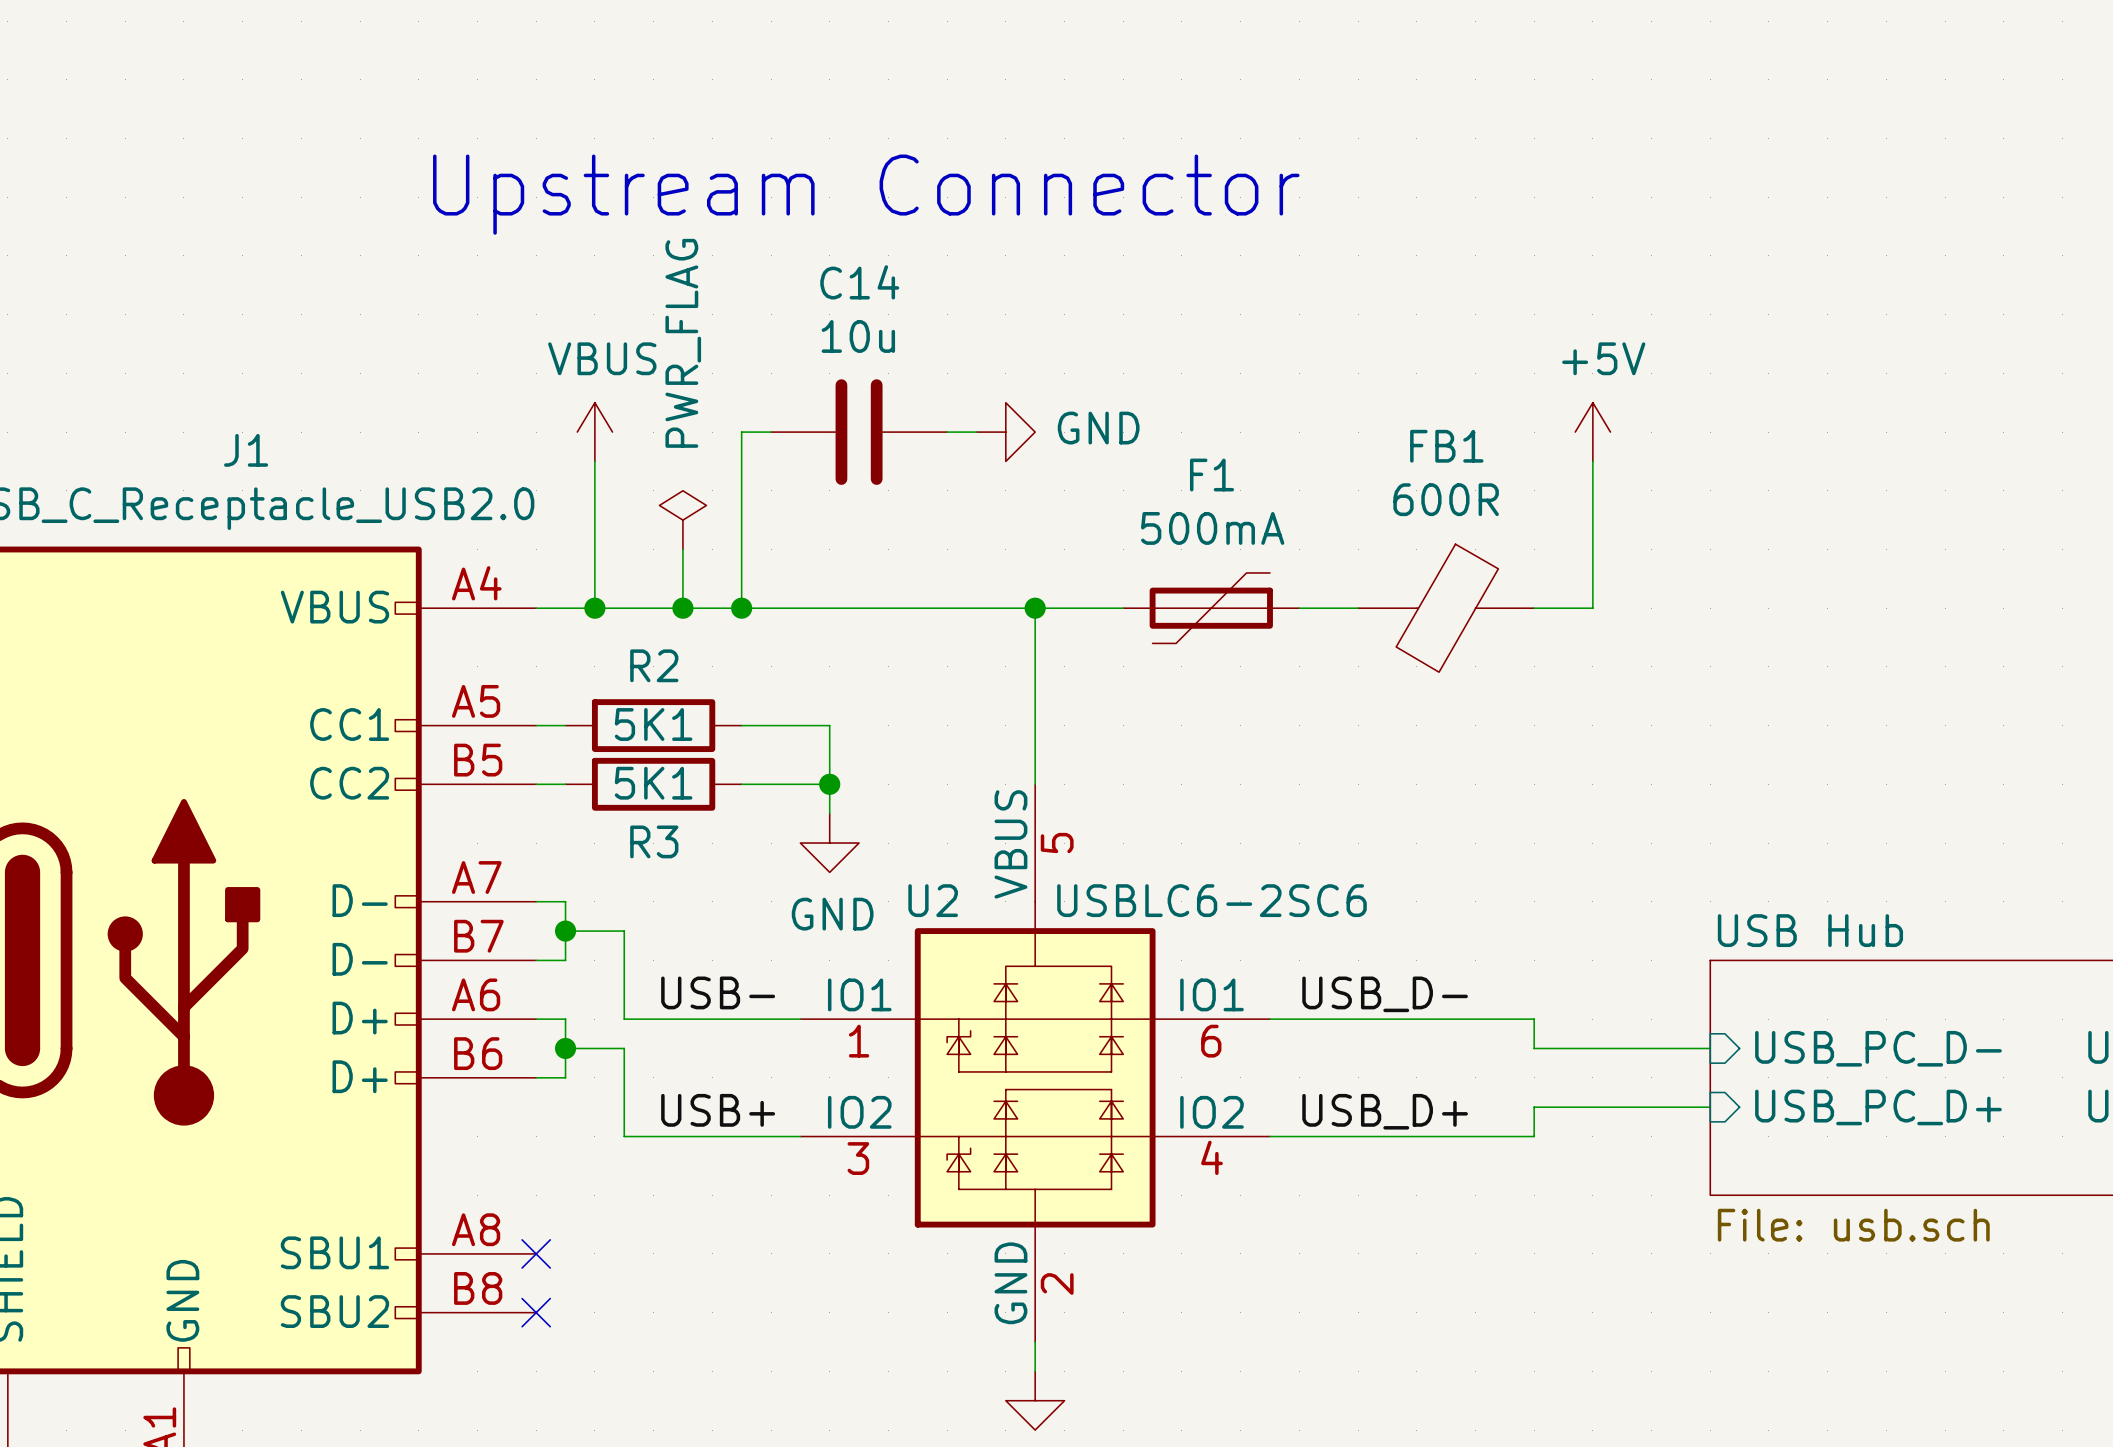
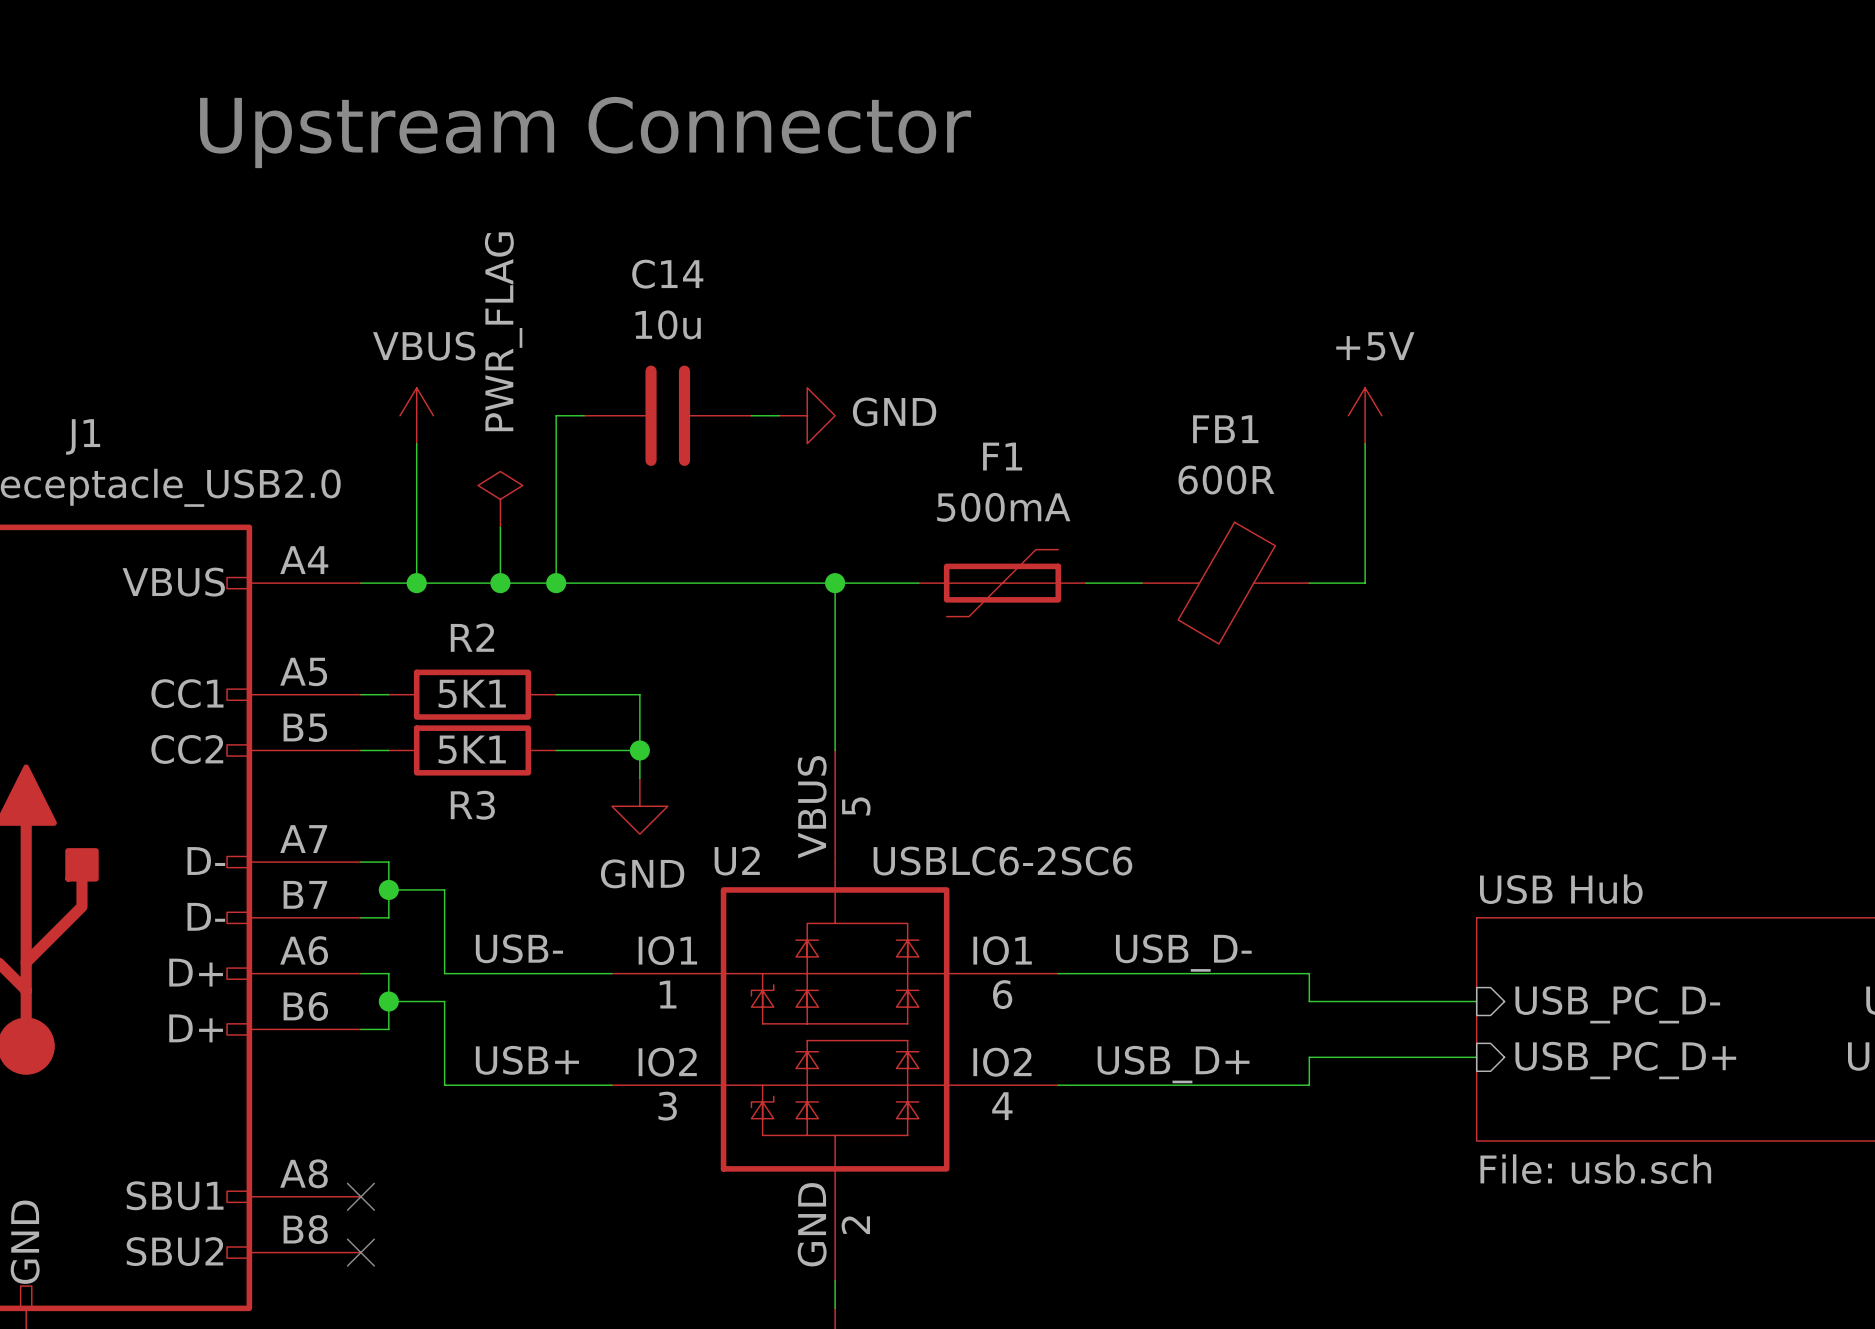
text position: Upstream Connector (866, 194) -> Upstream Connector (585, 132)

